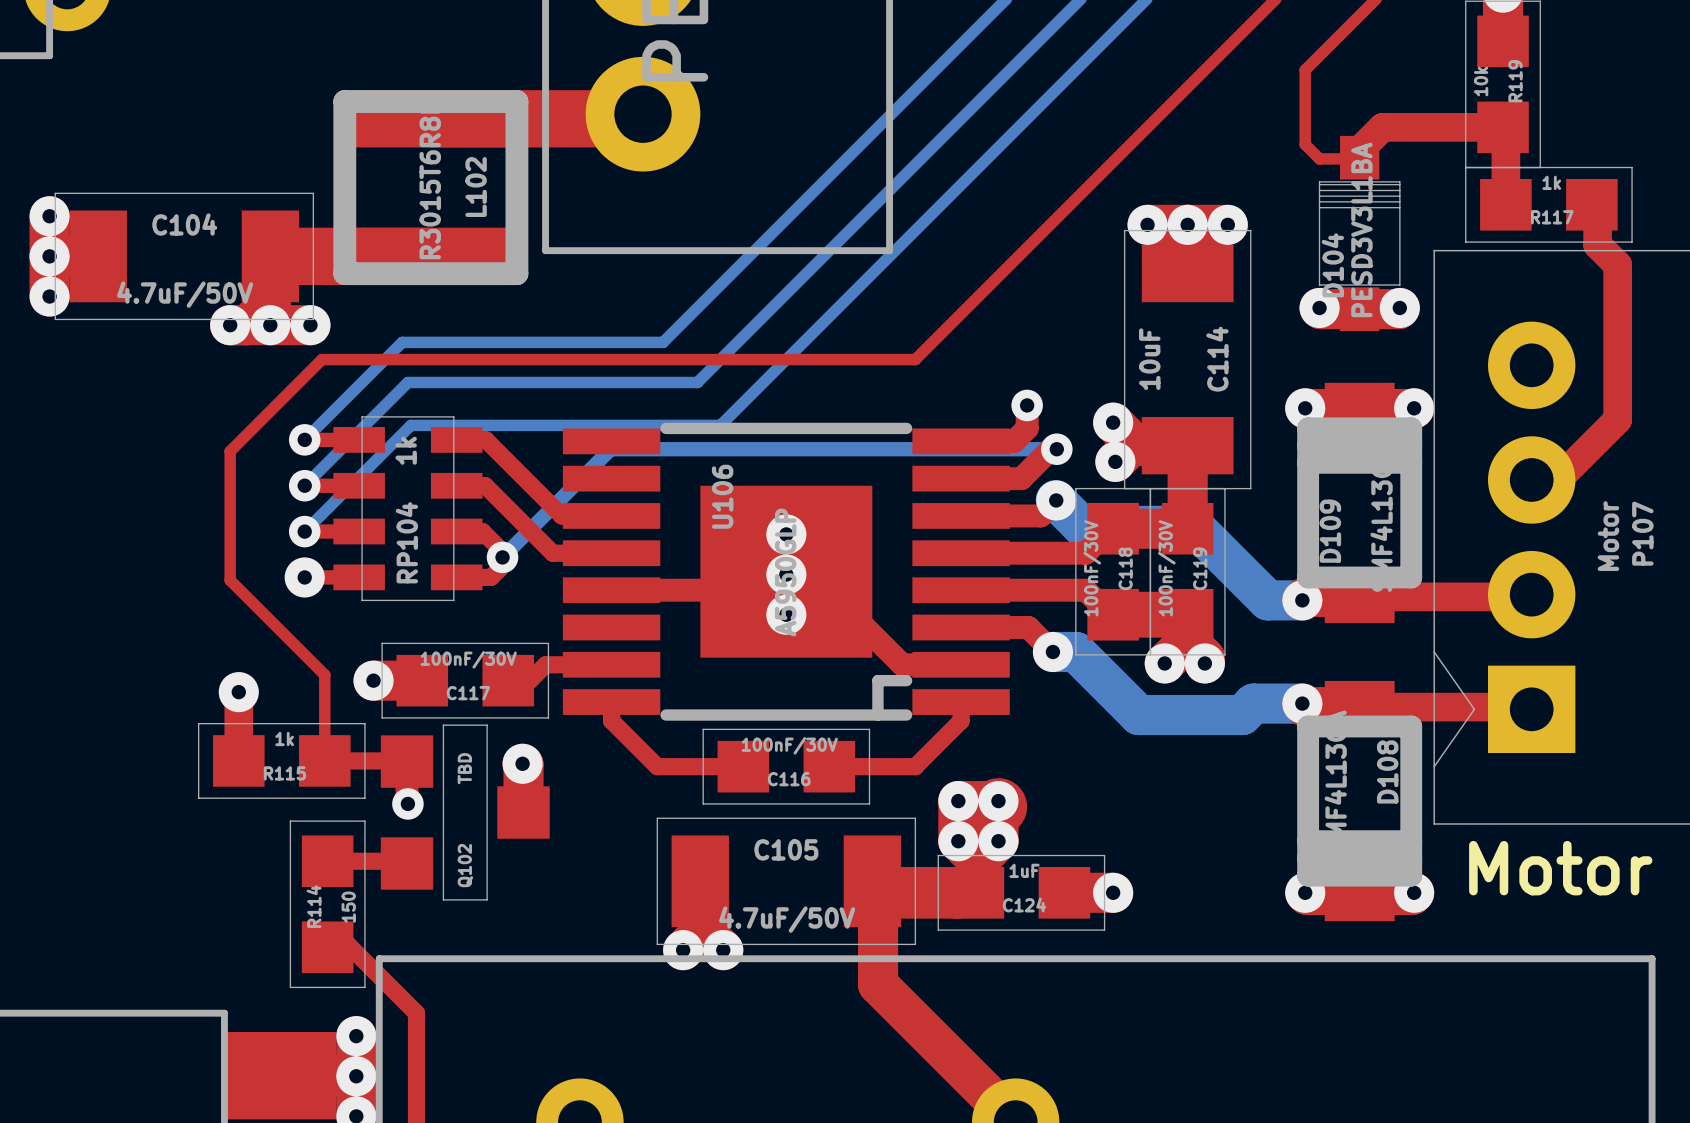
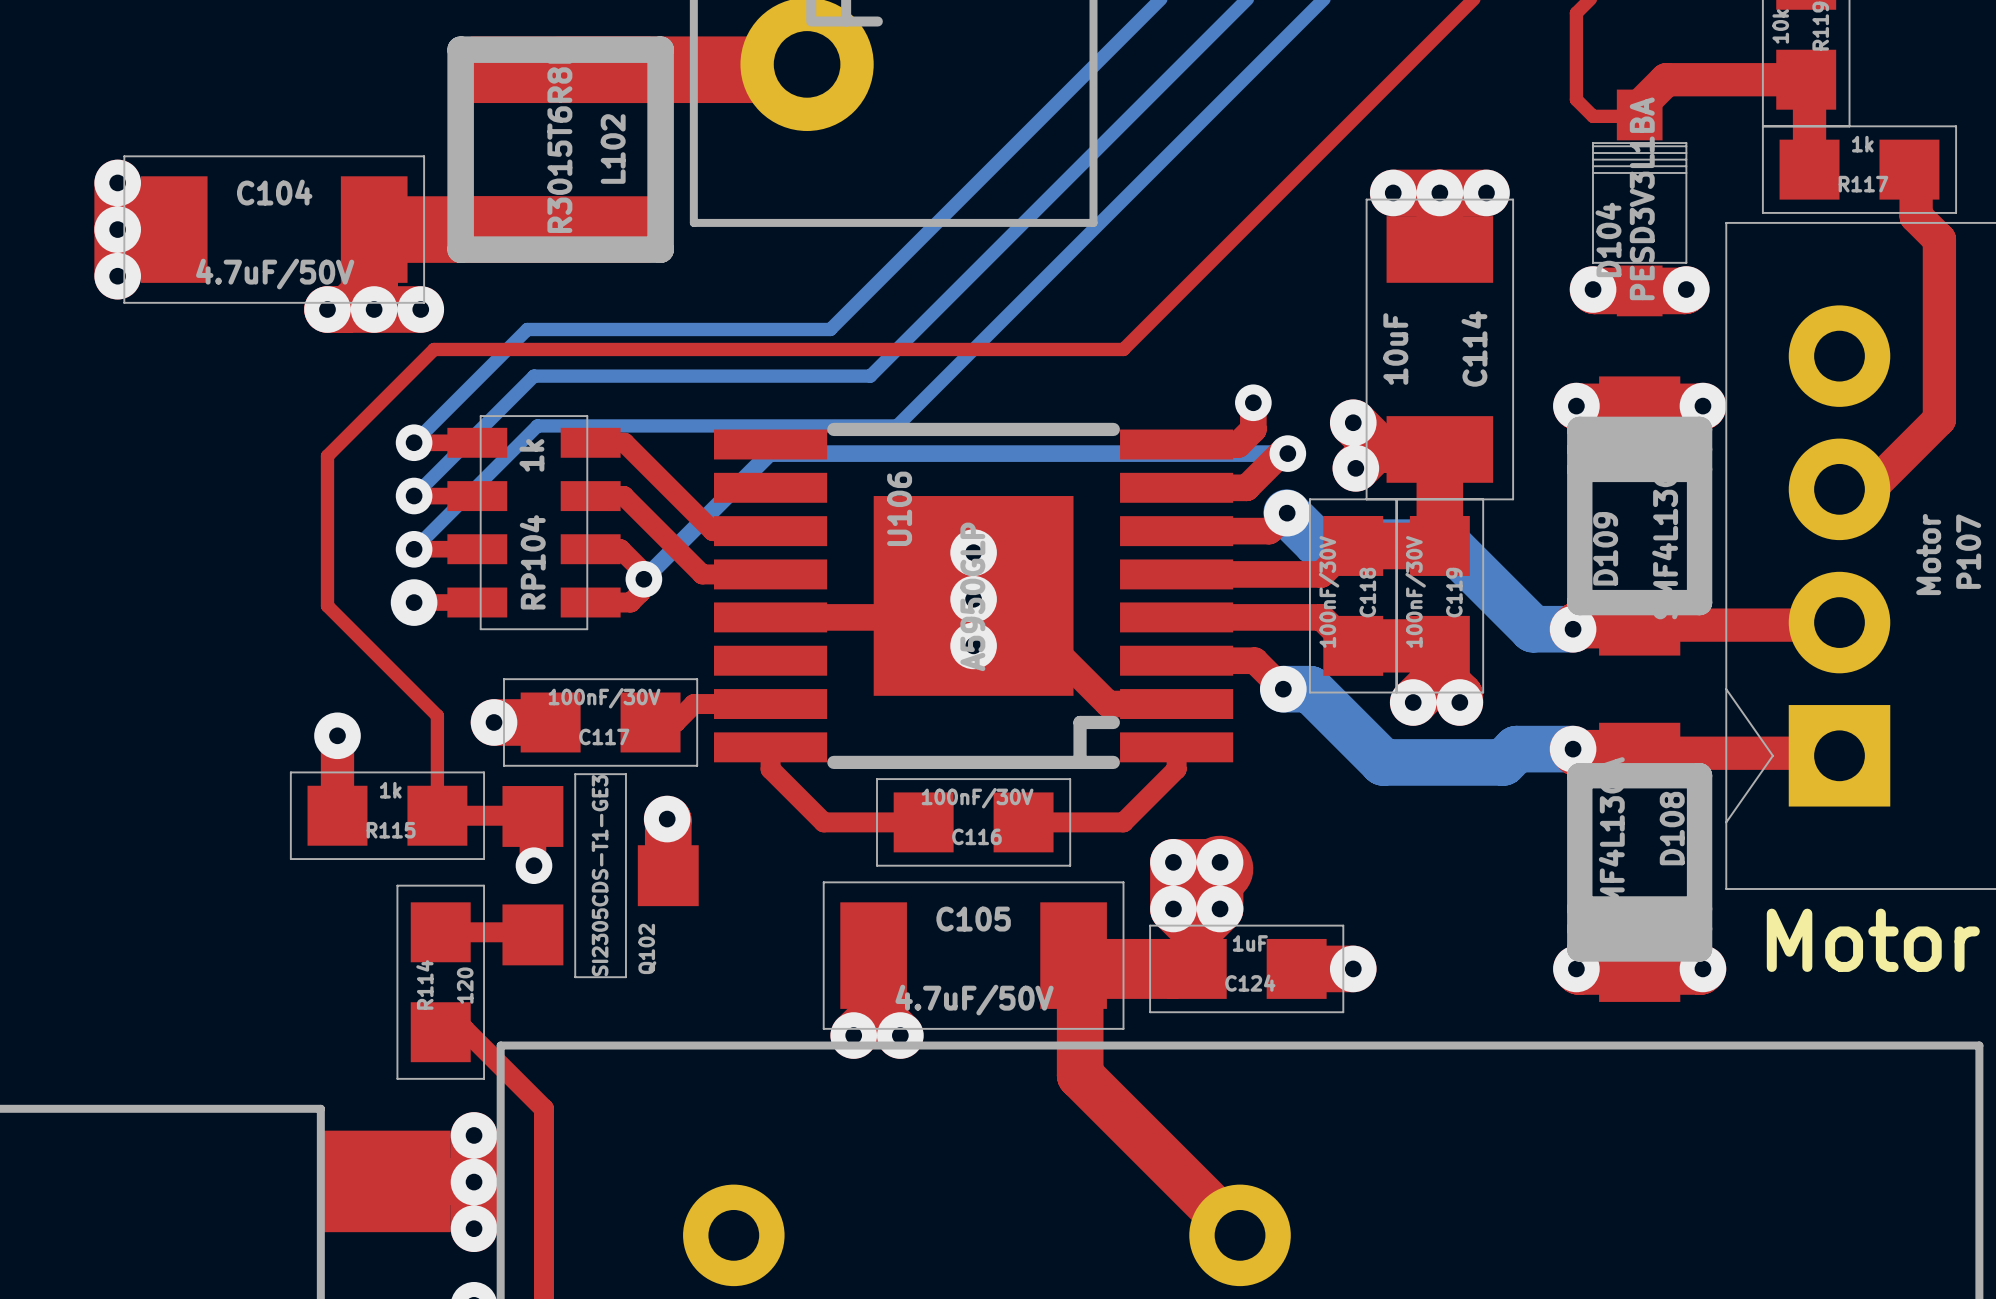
Q102 value: TBD (464, 768) -> SI2305CDS-T1-GE3 (600, 875)
Q102 name position: Q102 (465, 865) -> Q102 (647, 948)
R114 value: 150 (348, 907) -> 120 (465, 985)

